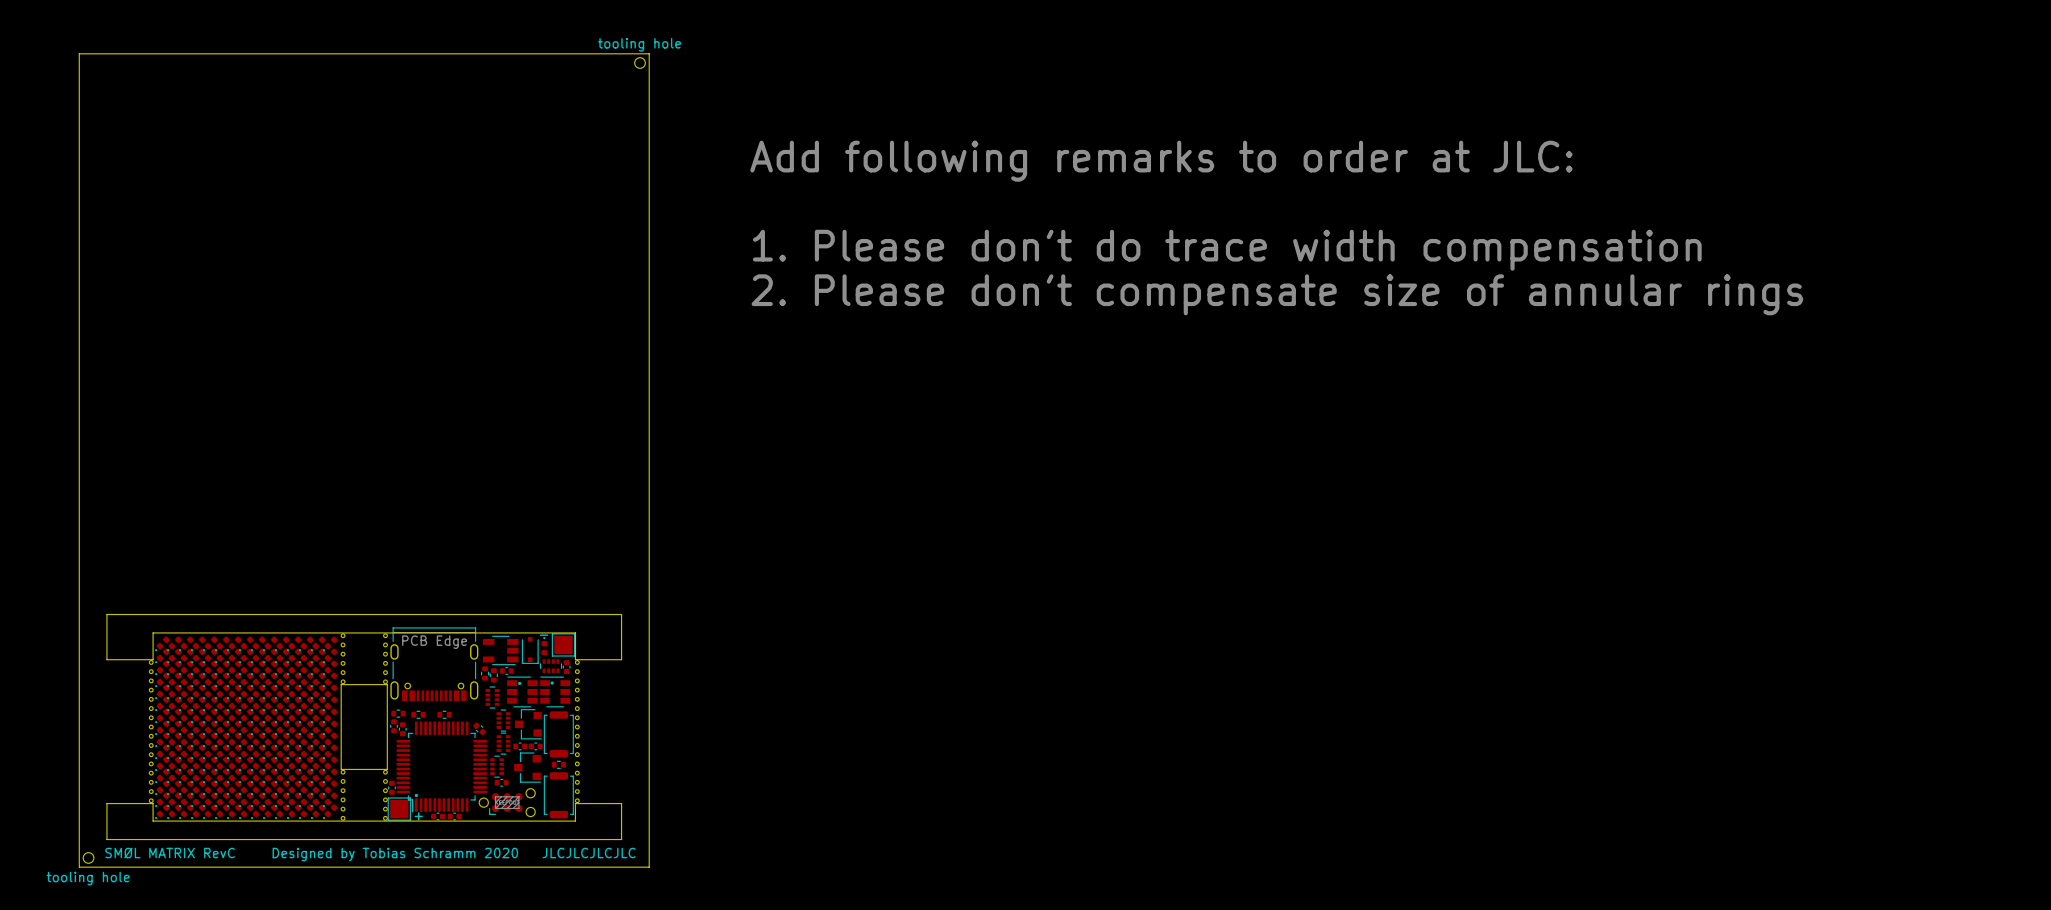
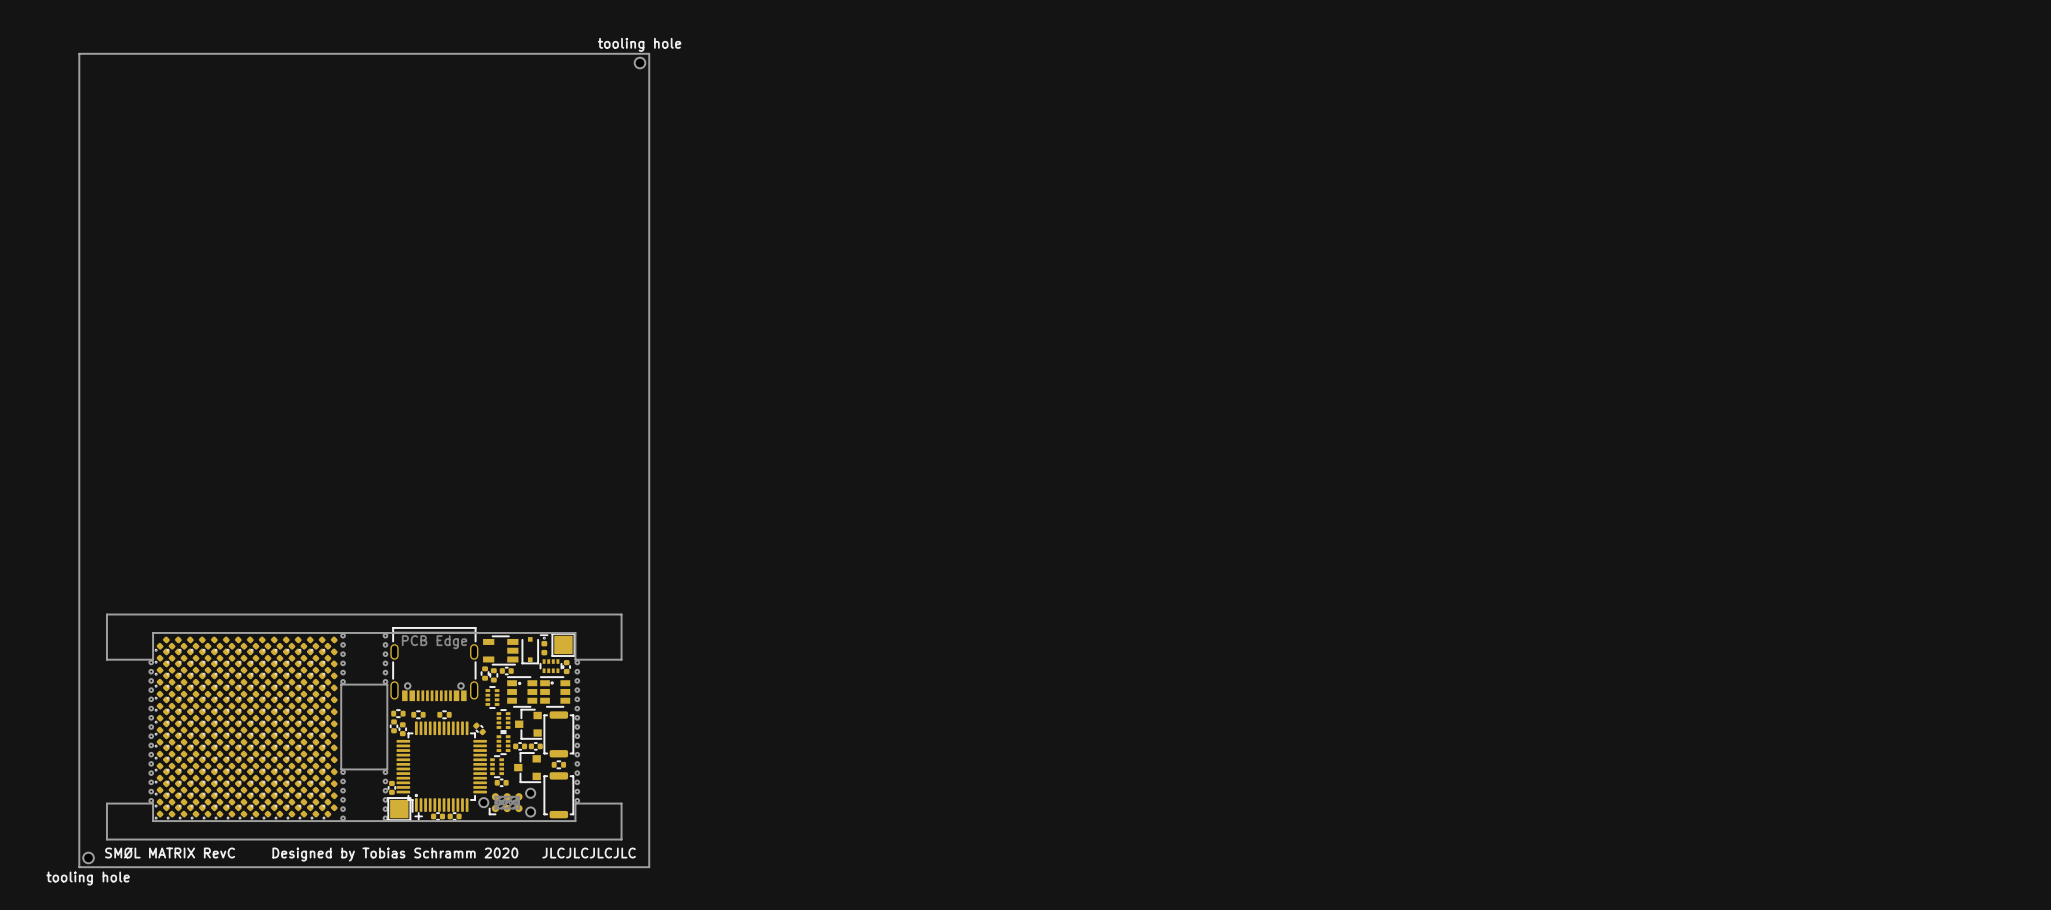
text: Add following remarks to order at JLC: (1161, 161) -> none
text: 1. Please don't do trace width compensation (1227, 250) -> none
text: 2. Please don't compensate size of annular rings (1277, 294) -> none

